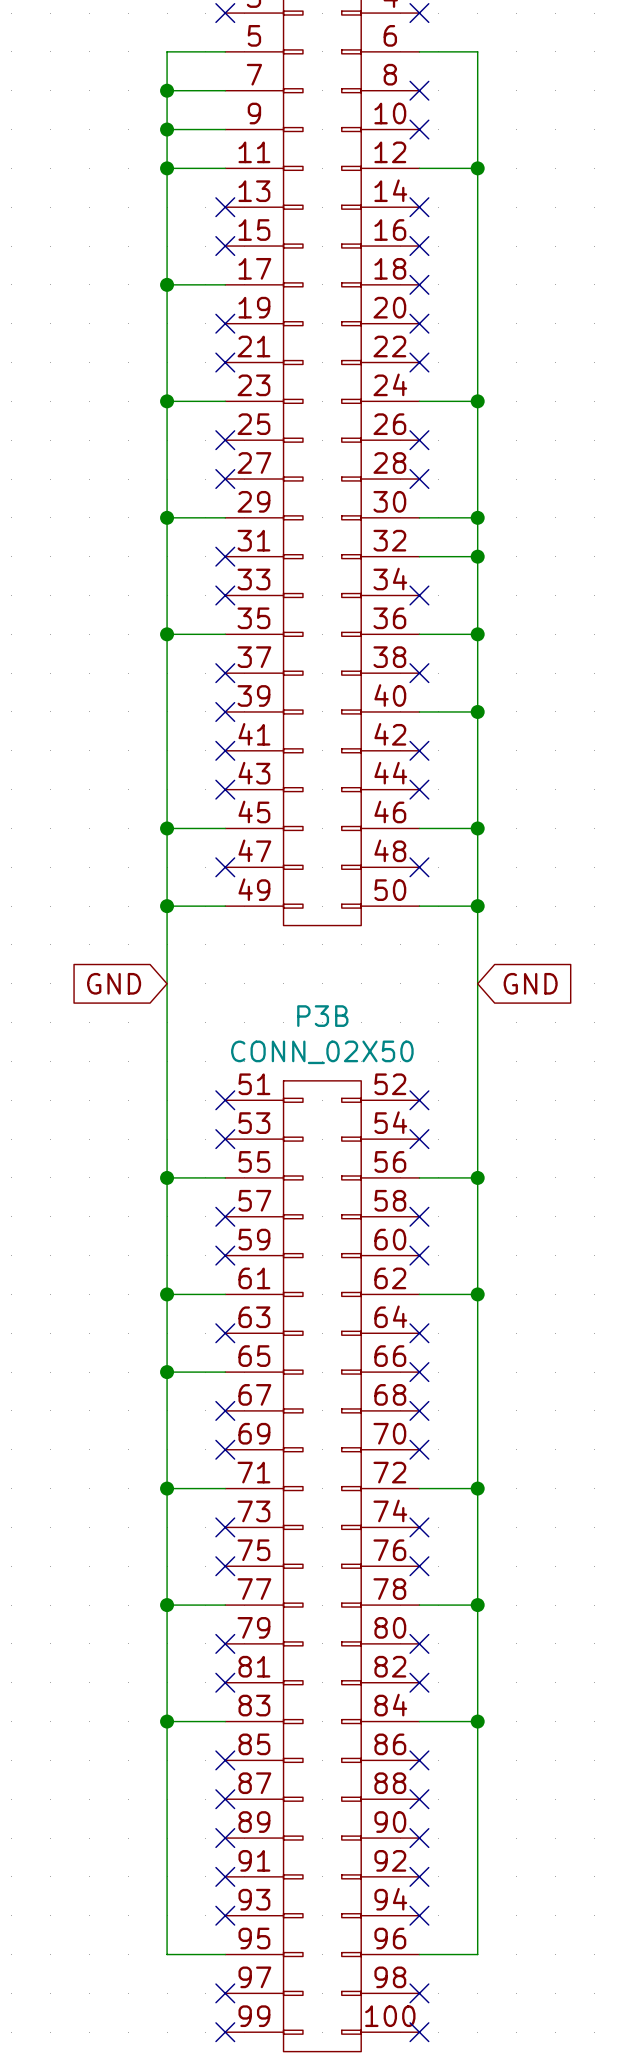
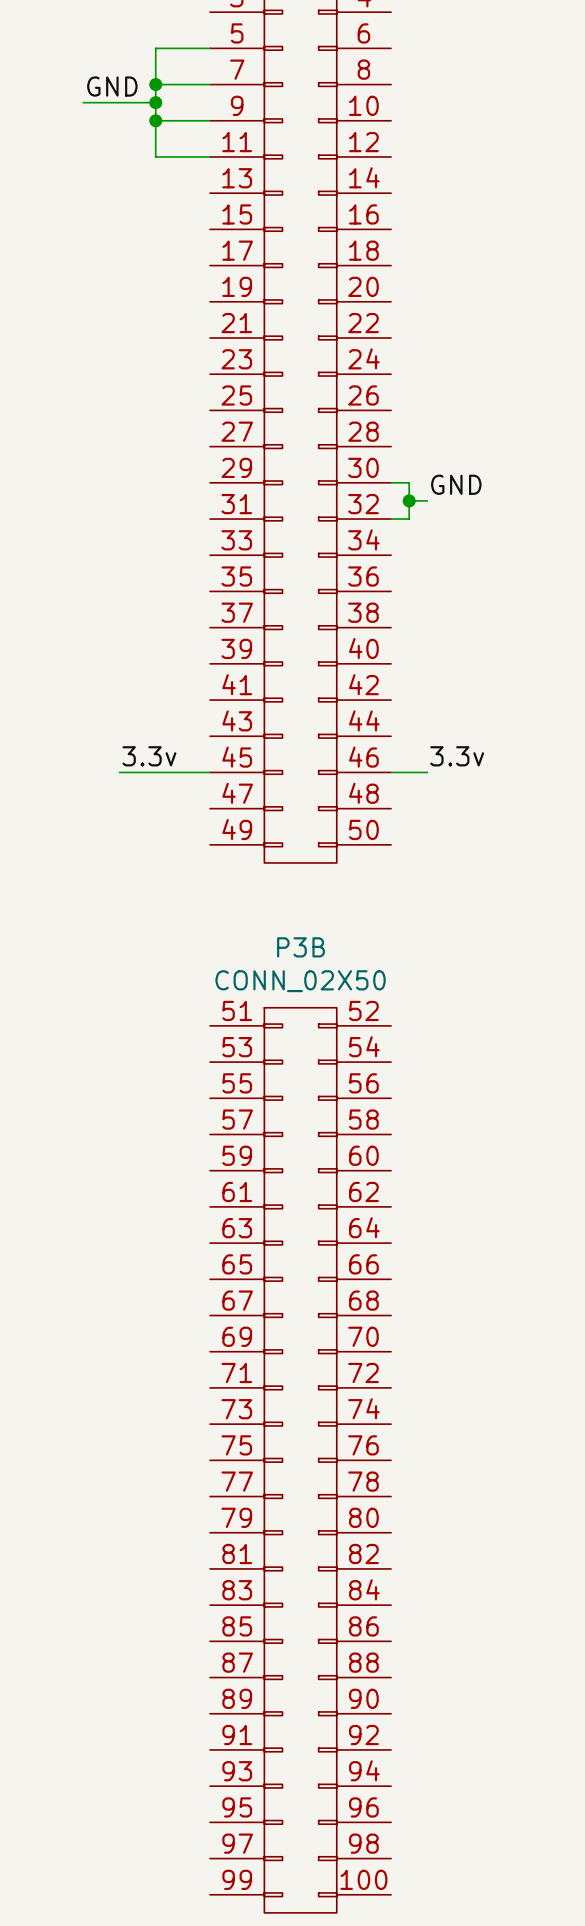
no-connect mark: (225, 13) -> none
no-connect mark: (419, 13) -> none
wire: (419, 51) (477, 51) (477, 1954) (419, 1954) -> none
no-connect mark: (419, 90) -> none
label: none -> GND (112, 86)
wire: none -> (83, 102) (155, 102)
no-connect mark: (419, 129) -> none
wire: (167, 168) (167, 1954) (225, 1954) -> none
junction position: (167, 168) -> (155, 102)
wire: (419, 168) (477, 168) -> none
junction: (477, 168) -> none
no-connect mark: (225, 207) -> none
no-connect mark: (419, 207) -> none
no-connect mark: (225, 246) -> none
no-connect mark: (419, 246) -> none
wire: (167, 284) (225, 284) -> none
junction: (167, 284) -> none
no-connect mark: (419, 284) -> none
no-connect mark: (225, 323) -> none
no-connect mark: (419, 323) -> none
no-connect mark: (225, 362) -> none
no-connect mark: (419, 362) -> none
wire: (167, 401) (225, 401) -> none
junction: (167, 401) -> none
wire: (419, 401) (477, 401) -> none
junction: (477, 401) -> none
no-connect mark: (225, 440) -> none
no-connect mark: (419, 440) -> none
no-connect mark: (225, 479) -> none
no-connect mark: (419, 479) -> none
wire: (167, 517) (225, 517) -> none
junction: (167, 517) -> none
wire: (438, 517) (477, 517) -> (409, 482) (409, 519)
junction: (477, 517) -> none
label: none -> GND (456, 484)
junction: none -> (409, 500)
no-connect mark: (225, 556) -> none
wire: (438, 556) (477, 556) -> none
junction: (477, 556) -> none
no-connect mark: (225, 595) -> none
no-connect mark: (419, 595) -> none
wire: (167, 634) (225, 634) -> none
junction: (167, 634) -> none
wire: (419, 634) (477, 634) -> none
junction: (477, 634) -> none
no-connect mark: (225, 673) -> none
no-connect mark: (419, 673) -> none
no-connect mark: (225, 711) -> none
wire: (419, 711) (477, 711) -> none
junction: (477, 711) -> none
no-connect mark: (225, 750) -> none
no-connect mark: (419, 750) -> none
no-connect mark: (225, 789) -> none
no-connect mark: (419, 789) -> none
label: none -> 3.3v (149, 756)
label: none -> 3.3v (457, 756)
wire: none -> (119, 772) (155, 772)
junction: (167, 828) -> none
wire: (458, 828) (477, 828) -> (409, 500) (427, 500)
junction: (477, 828) -> none
no-connect mark: (225, 867) -> none
no-connect mark: (419, 867) -> none
wire: (167, 906) (225, 906) -> none
junction: (167, 906) -> none
wire: (419, 906) (477, 906) -> none
junction: (477, 906) -> none
global label: GND (114, 983) -> none
global label: GND (530, 983) -> none
no-connect mark: (225, 1100) -> none
no-connect mark: (419, 1100) -> none
no-connect mark: (225, 1139) -> none
no-connect mark: (419, 1139) -> none
wire: (167, 1177) (225, 1177) -> none
junction: (167, 1177) -> none
wire: (419, 1177) (477, 1177) -> none
junction: (477, 1177) -> none
no-connect mark: (225, 1216) -> none
no-connect mark: (419, 1216) -> none
no-connect mark: (225, 1255) -> none
no-connect mark: (419, 1255) -> none
wire: (167, 1294) (225, 1294) -> none
junction: (167, 1294) -> none
wire: (419, 1294) (477, 1294) -> none
junction: (477, 1294) -> none
no-connect mark: (225, 1333) -> none
no-connect mark: (419, 1333) -> none
wire: (167, 1372) (225, 1372) -> none
junction: (167, 1372) -> none
no-connect mark: (419, 1372) -> none
no-connect mark: (225, 1410) -> none
no-connect mark: (419, 1410) -> none
no-connect mark: (225, 1449) -> none
no-connect mark: (419, 1449) -> none
wire: (167, 1488) (225, 1488) -> none
junction: (167, 1488) -> none
wire: (419, 1488) (477, 1488) -> none
junction: (477, 1488) -> none
no-connect mark: (225, 1527) -> none
no-connect mark: (419, 1527) -> none
no-connect mark: (225, 1566) -> none
no-connect mark: (419, 1566) -> none
wire: (167, 1605) (225, 1605) -> none
junction: (167, 1605) -> none
wire: (419, 1605) (477, 1605) -> none
junction: (477, 1605) -> none
no-connect mark: (225, 1643) -> none
no-connect mark: (419, 1643) -> none
no-connect mark: (225, 1682) -> none
no-connect mark: (419, 1682) -> none
wire: (167, 1721) (225, 1721) -> none
junction: (167, 1721) -> none
wire: (419, 1721) (477, 1721) -> none
junction: (477, 1721) -> none
no-connect mark: (225, 1760) -> none
no-connect mark: (419, 1760) -> none
no-connect mark: (225, 1799) -> none
no-connect mark: (419, 1799) -> none
no-connect mark: (225, 1838) -> none
no-connect mark: (419, 1838) -> none
no-connect mark: (225, 1876) -> none
no-connect mark: (419, 1876) -> none
no-connect mark: (225, 1915) -> none
no-connect mark: (419, 1915) -> none
no-connect mark: (225, 1993) -> none
no-connect mark: (419, 1993) -> none
no-connect mark: (225, 2032) -> none
no-connect mark: (419, 2032) -> none

